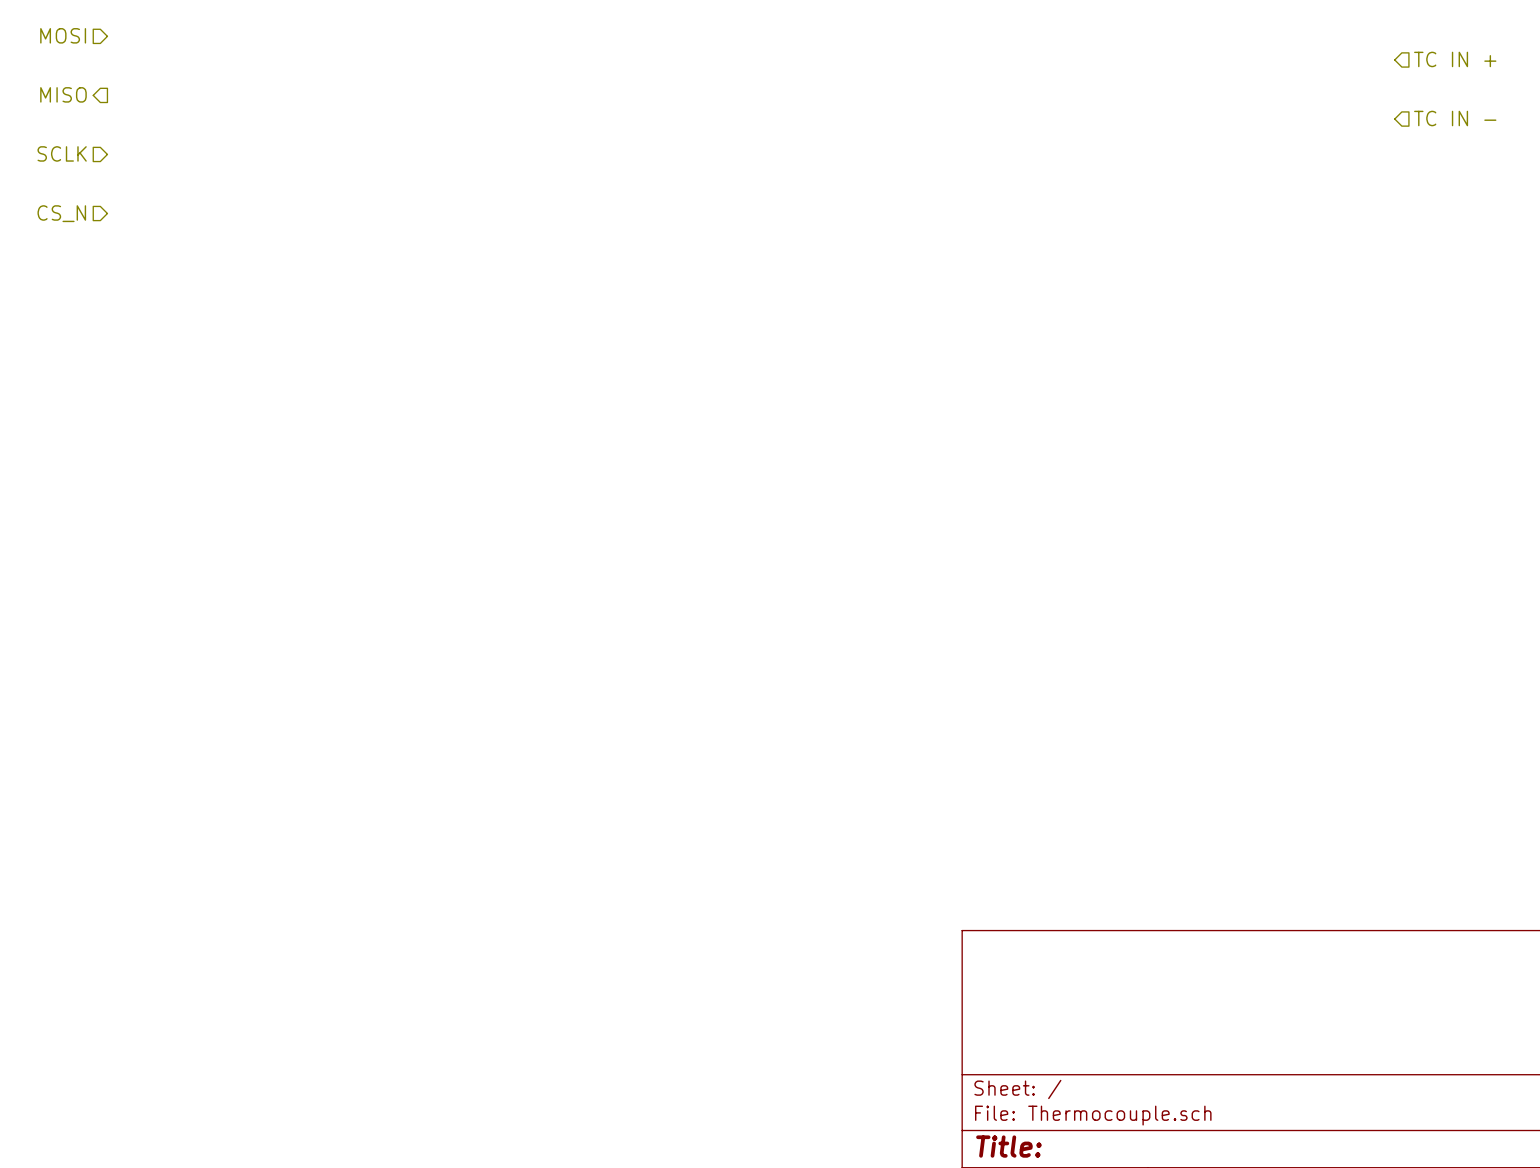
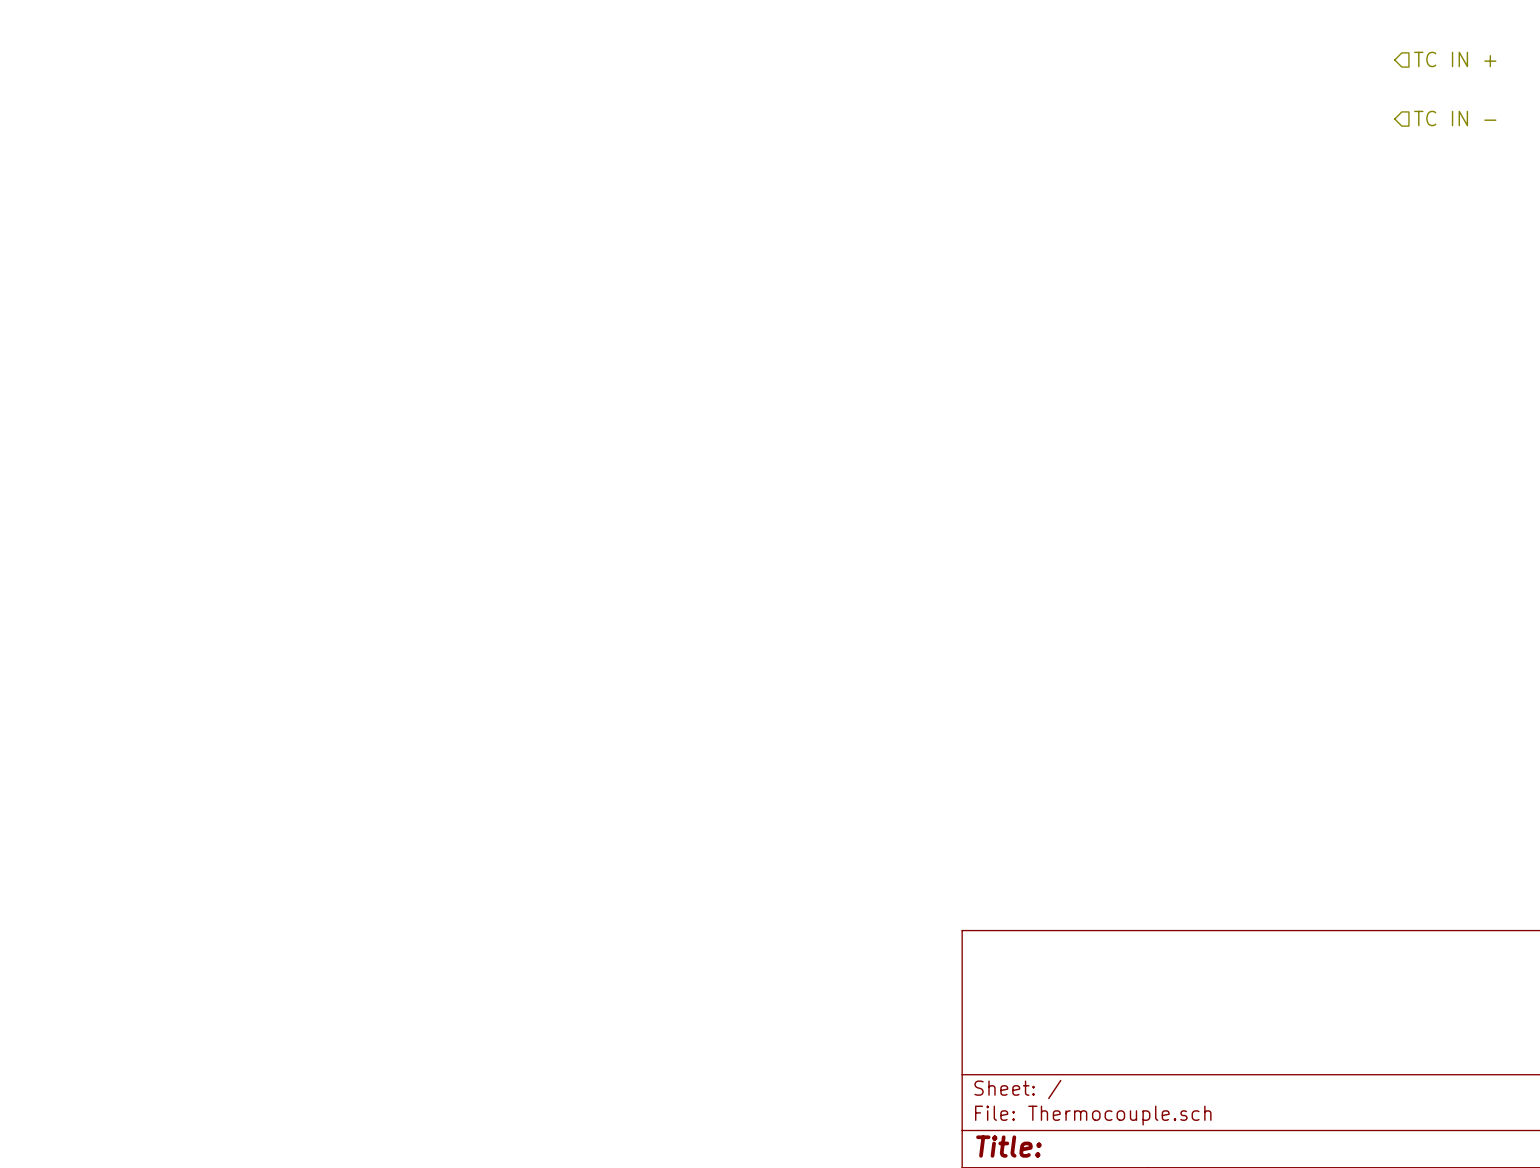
hierarchical label: MOSI (63, 35) -> none
hierarchical label: MISO (63, 94) -> none
hierarchical label: SCLK (62, 153) -> none
hierarchical label: CS_N (61, 213) -> none

